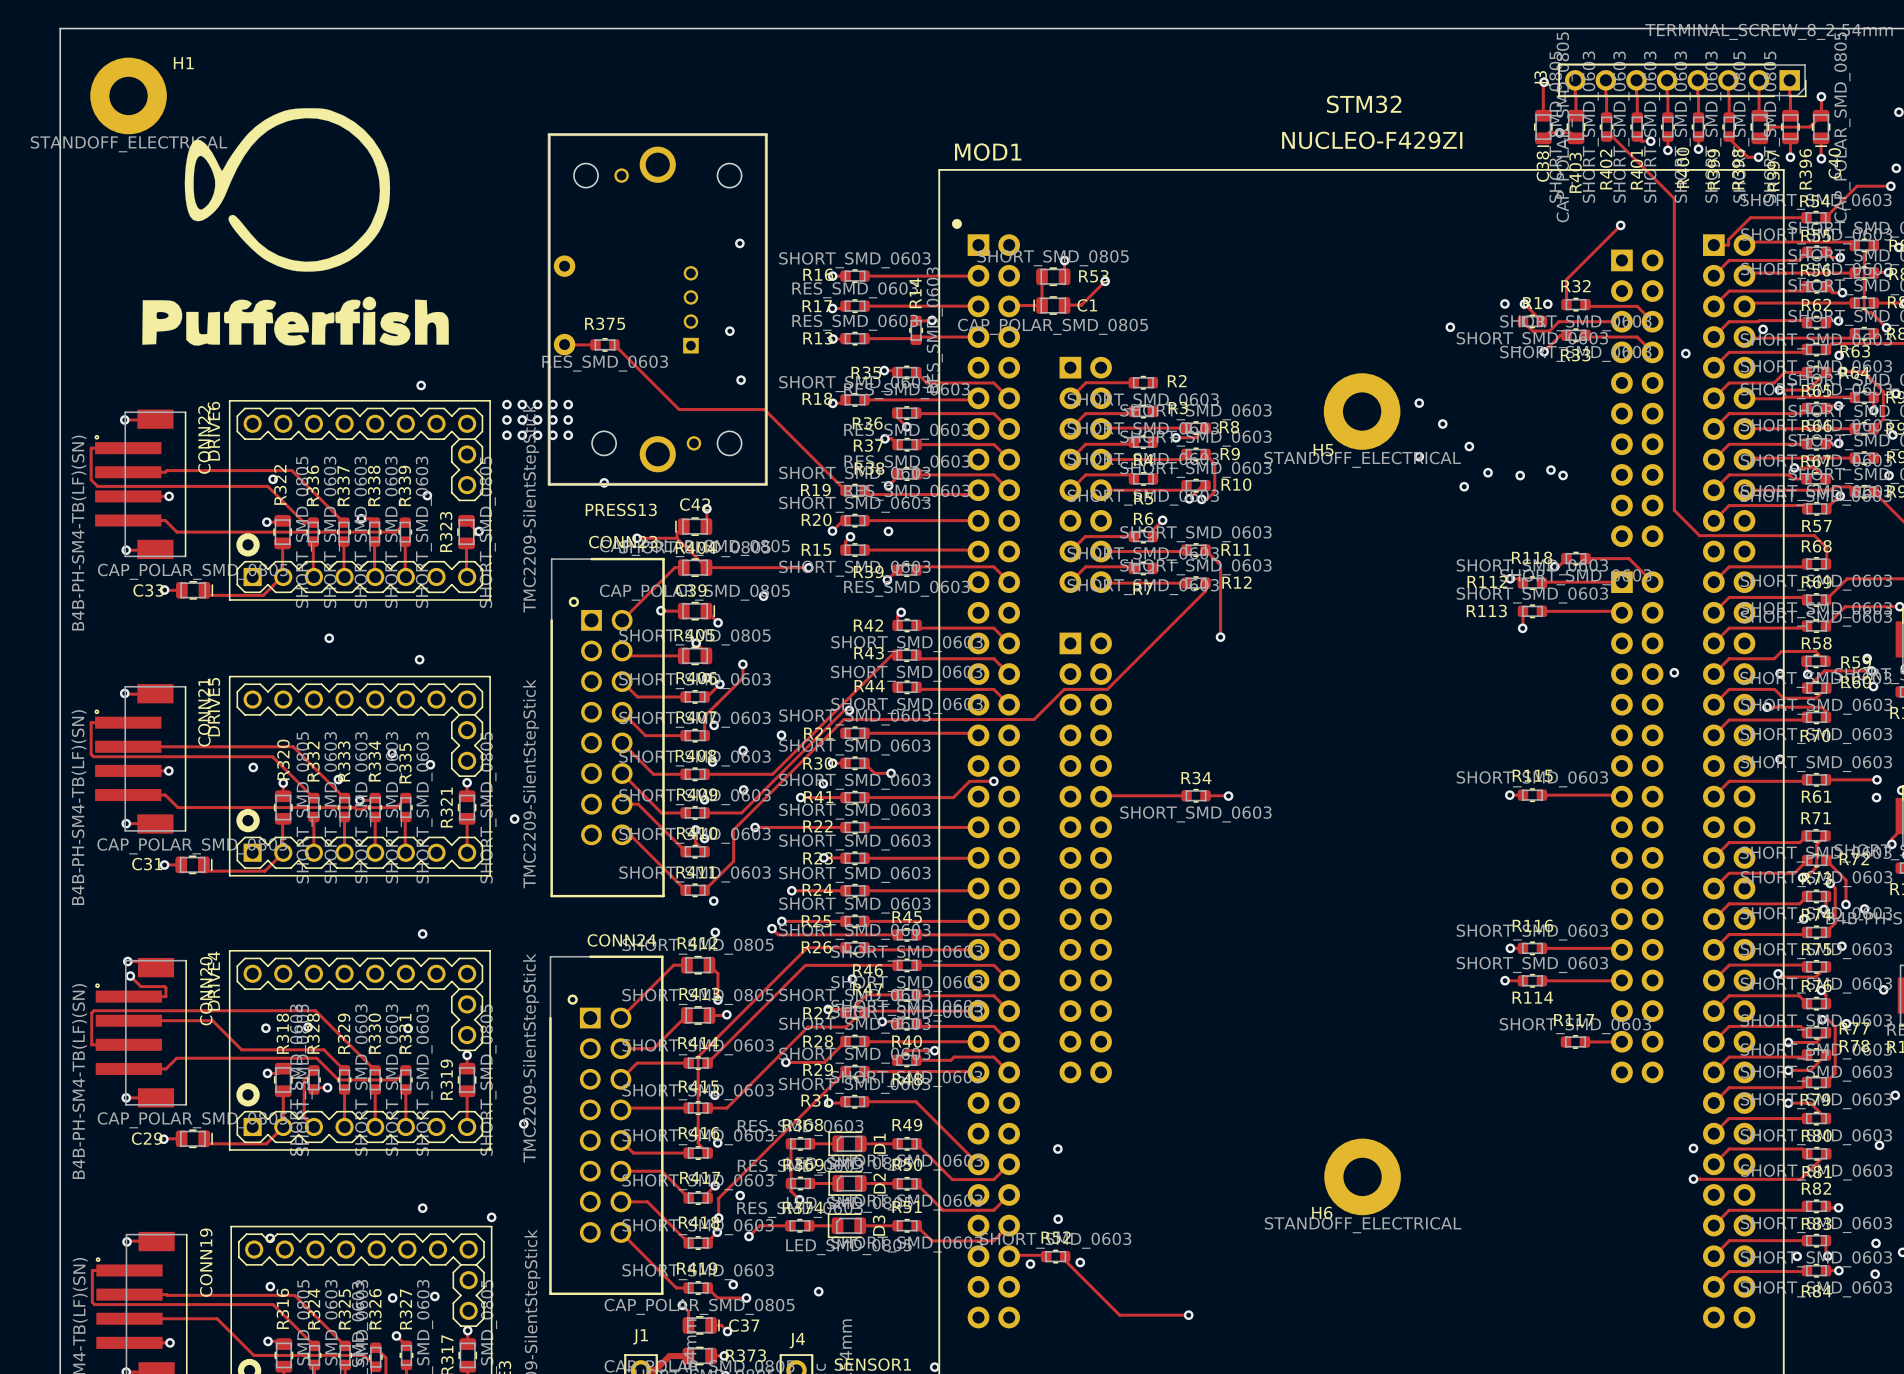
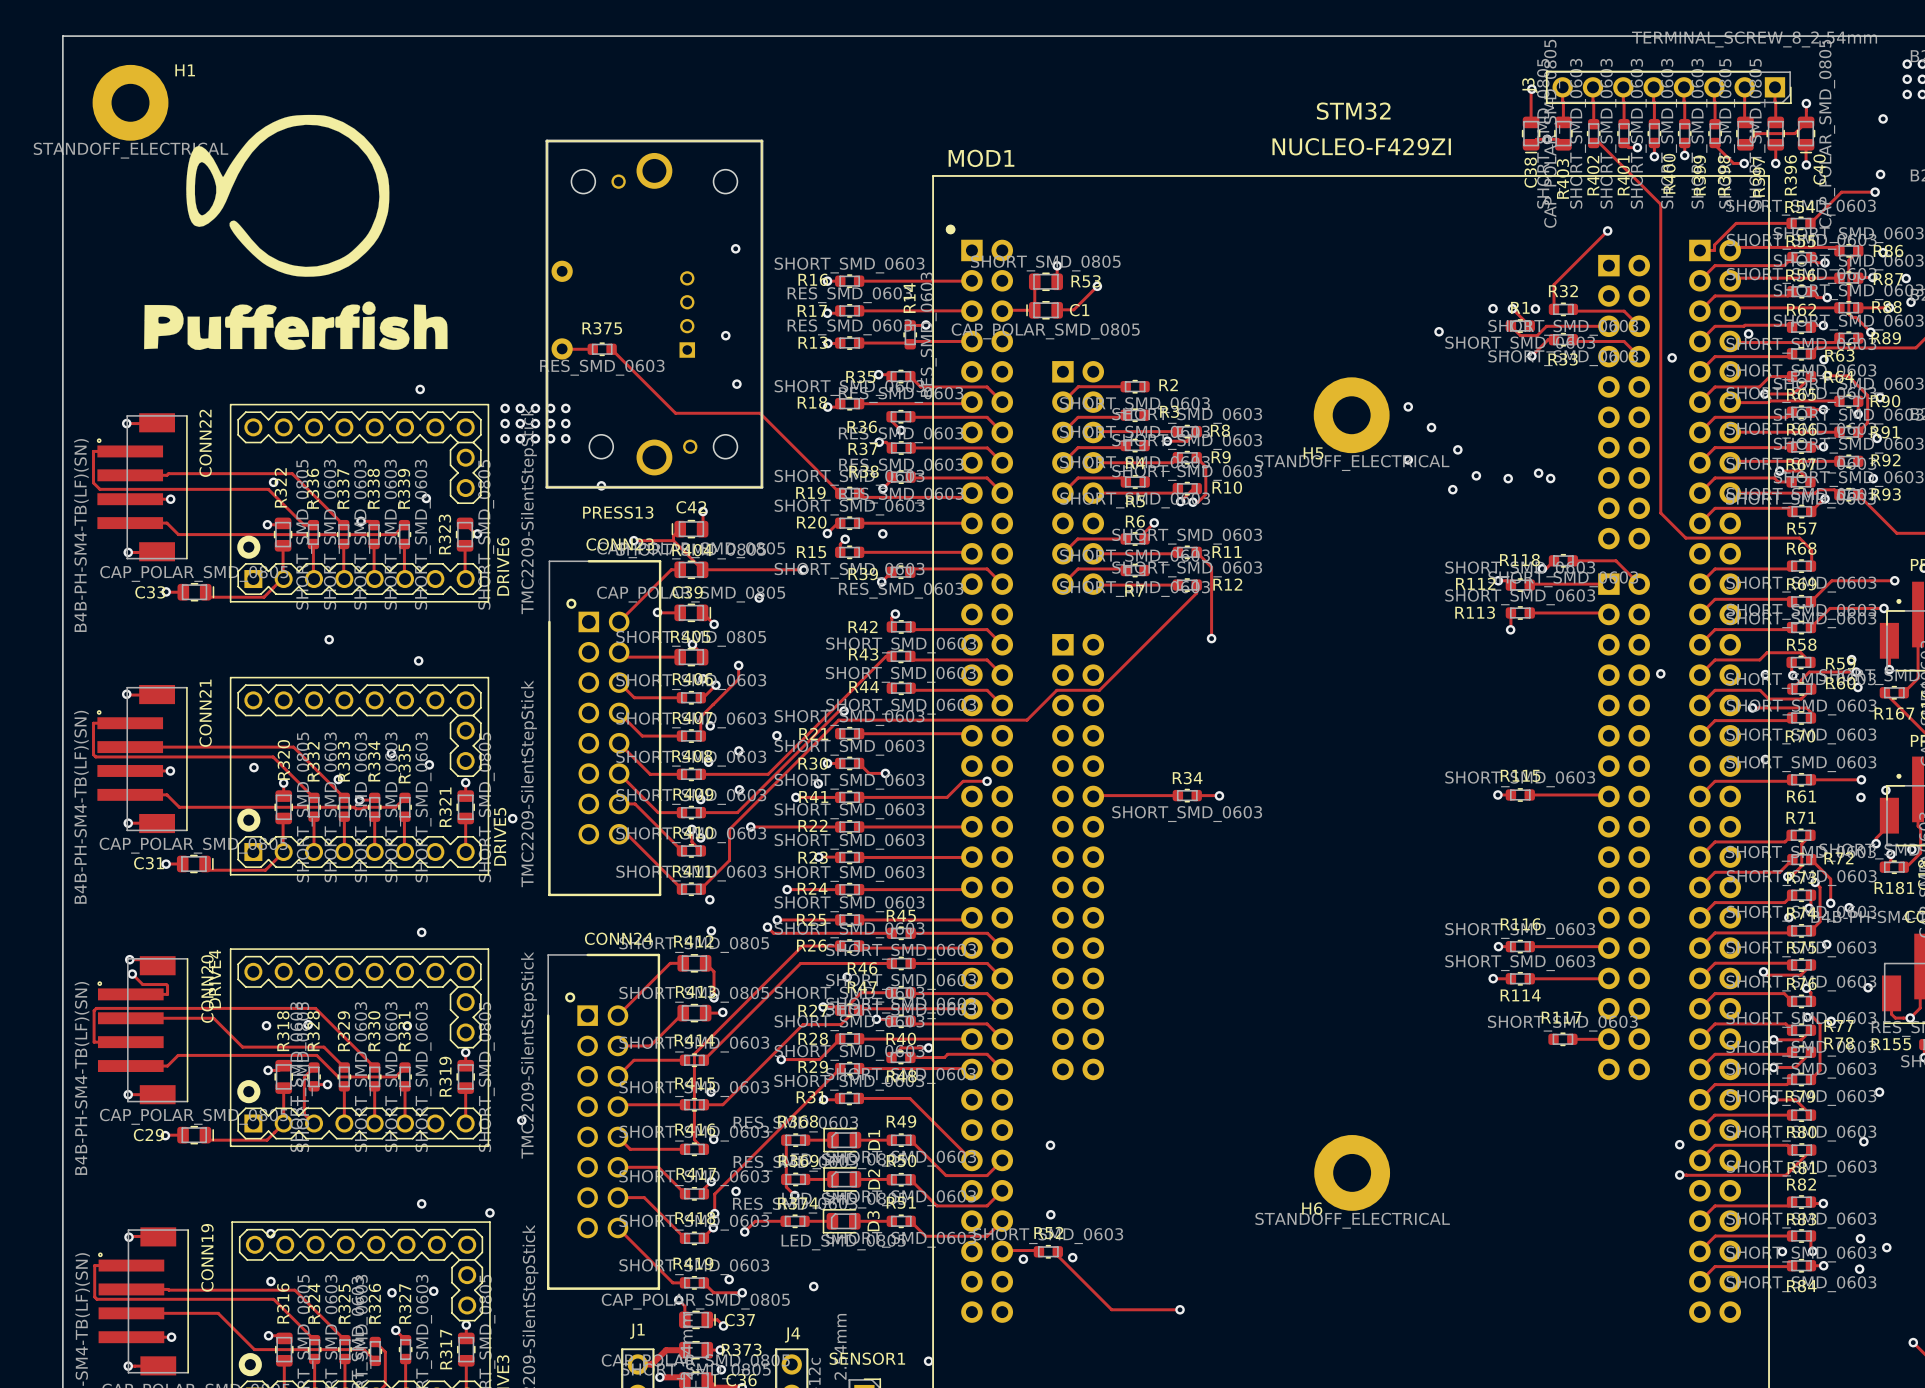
DRIVE6 name position: DRIVE6 (213, 431) -> DRIVE6 (503, 566)
DRIVE5 name position: DRIVE5 (214, 707) -> DRIVE5 (500, 836)

